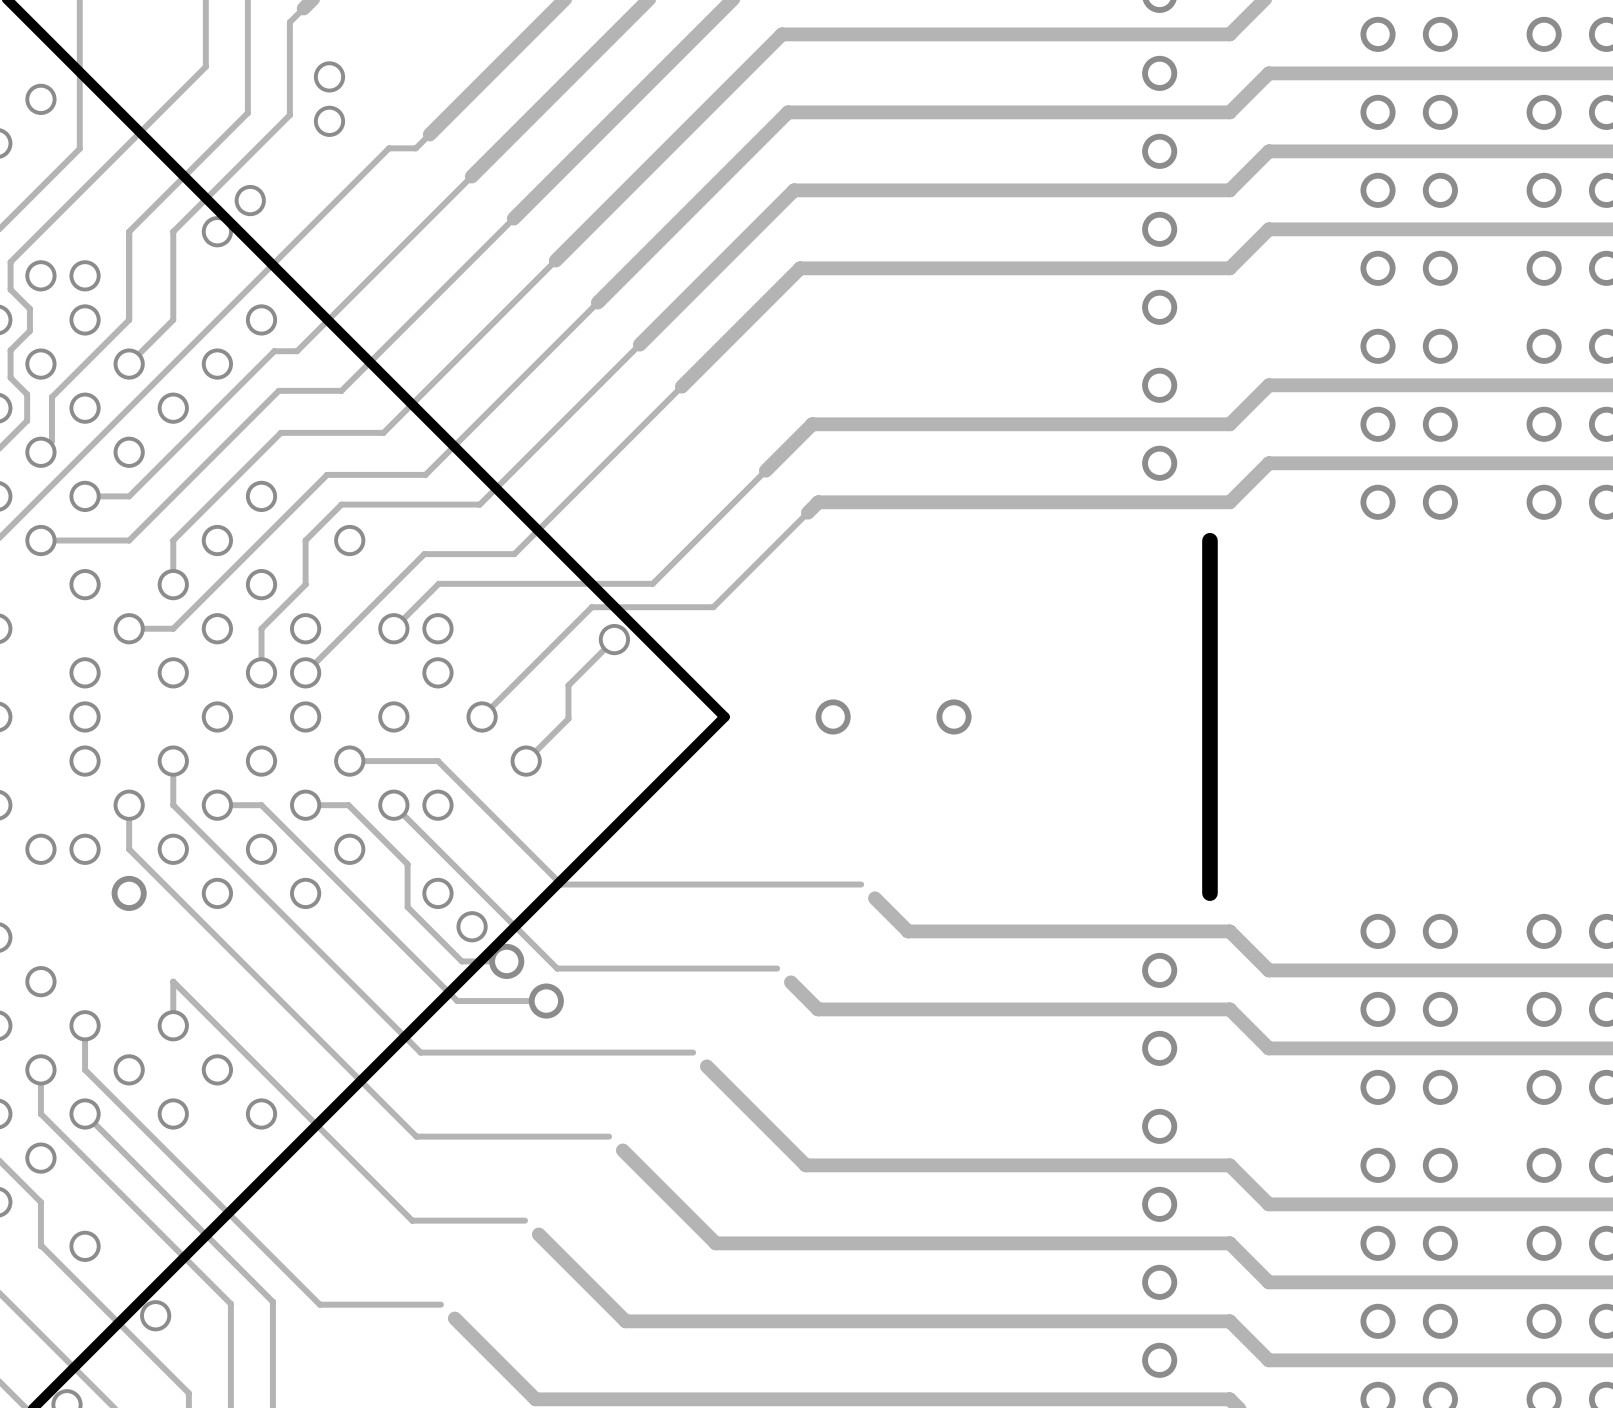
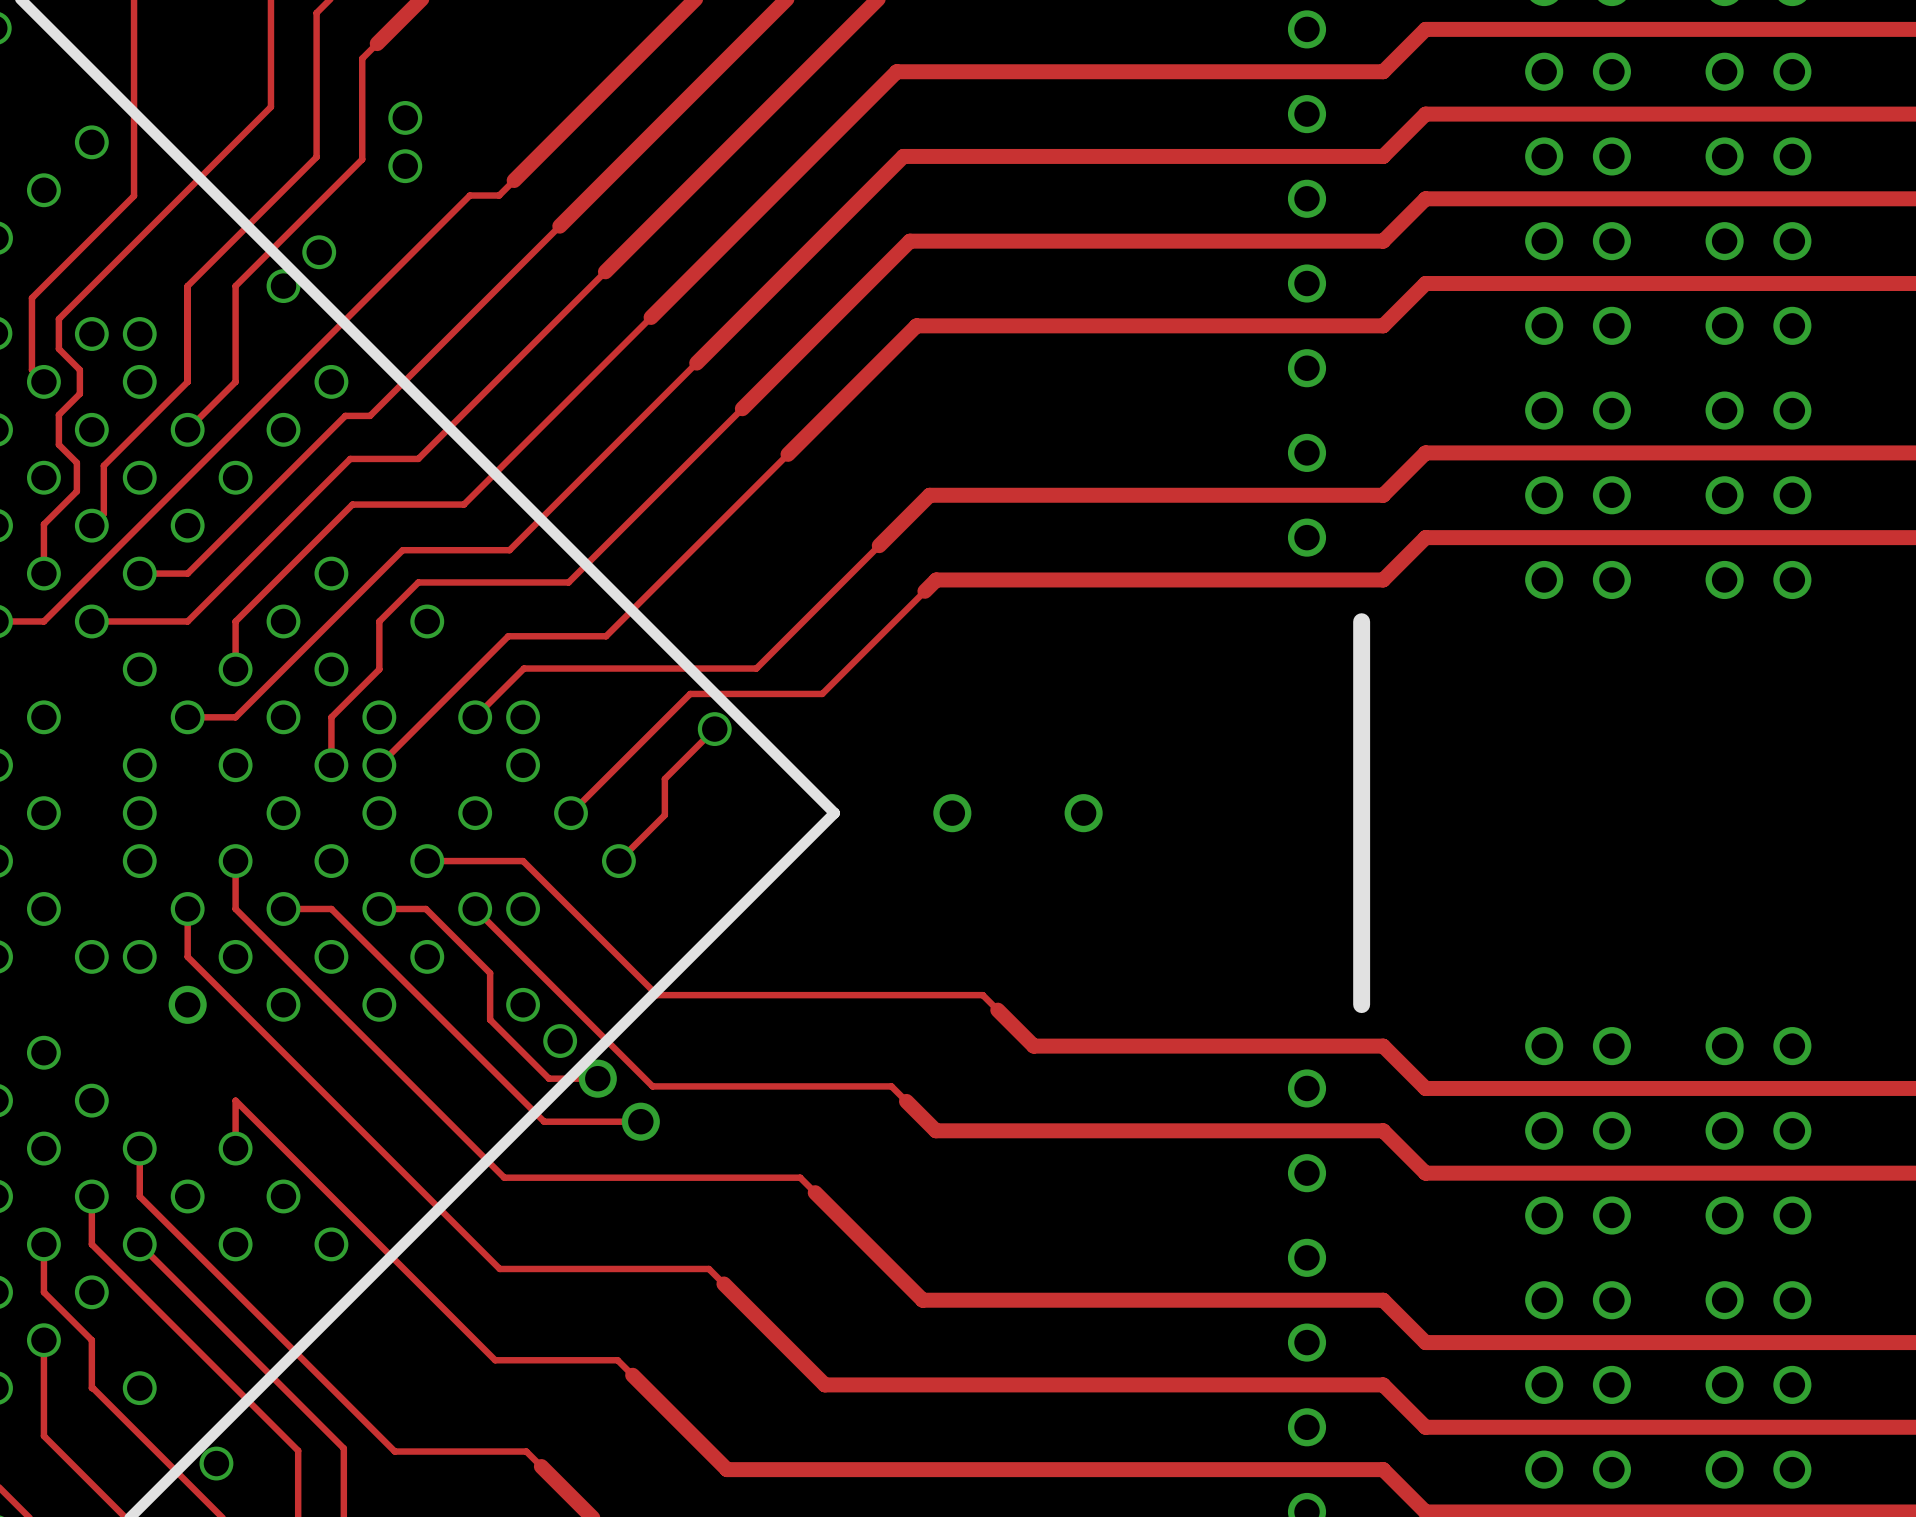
track: none -> (982, 995) (997, 1010)
track: none -> (891, 1086) (906, 1101)
track: none -> (800, 1177) (815, 1192)
track: none -> (708, 1268) (723, 1283)
track: none -> (617, 1360) (632, 1375)
track: none -> (526, 1451) (541, 1466)

